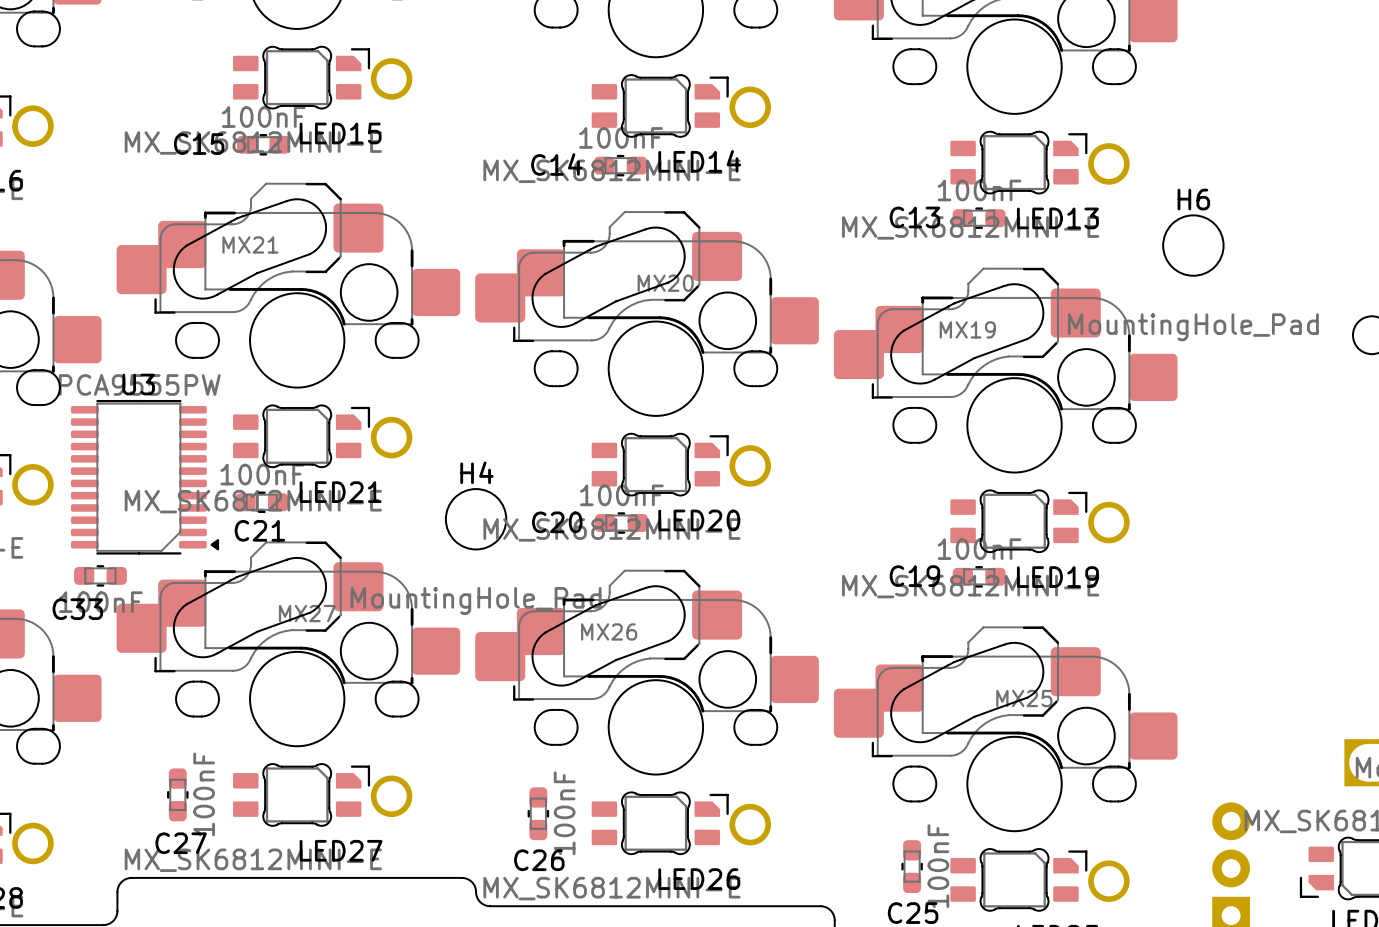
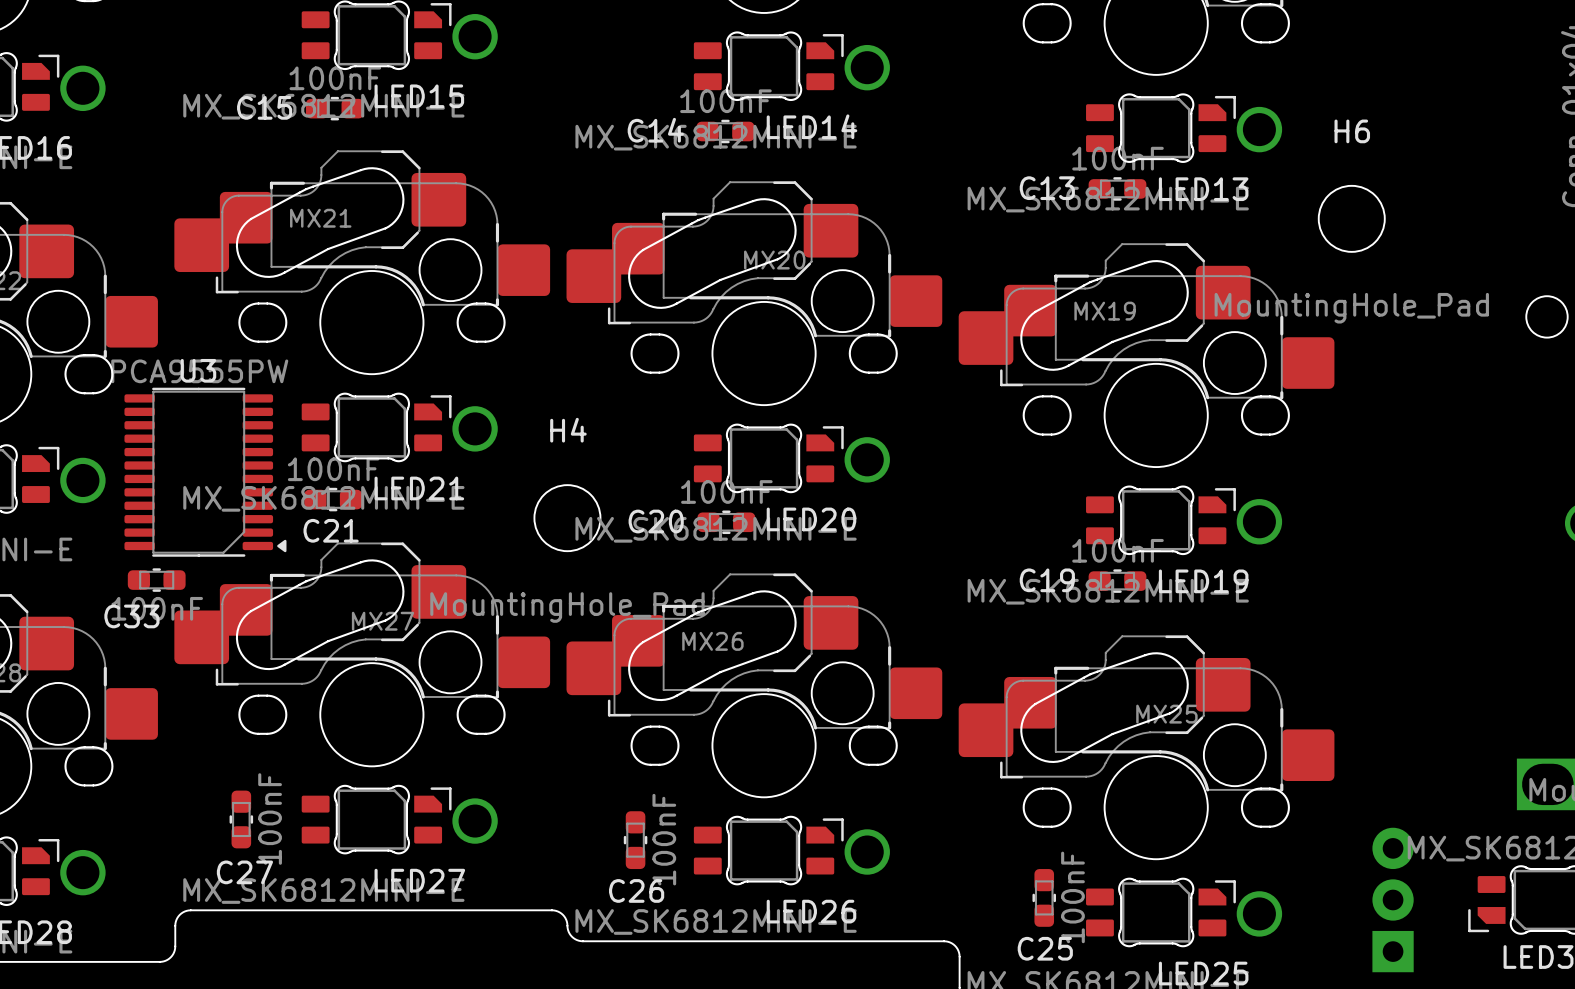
H6 name position: H6 (1193, 199) -> H6 (1352, 131)
H4 name position: H4 (476, 472) -> H4 (568, 430)

